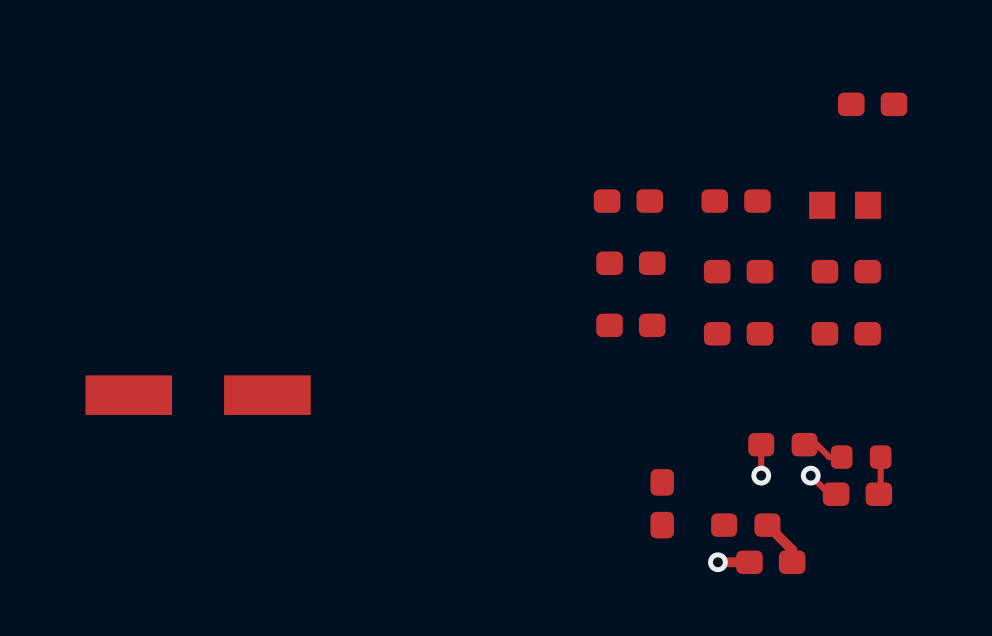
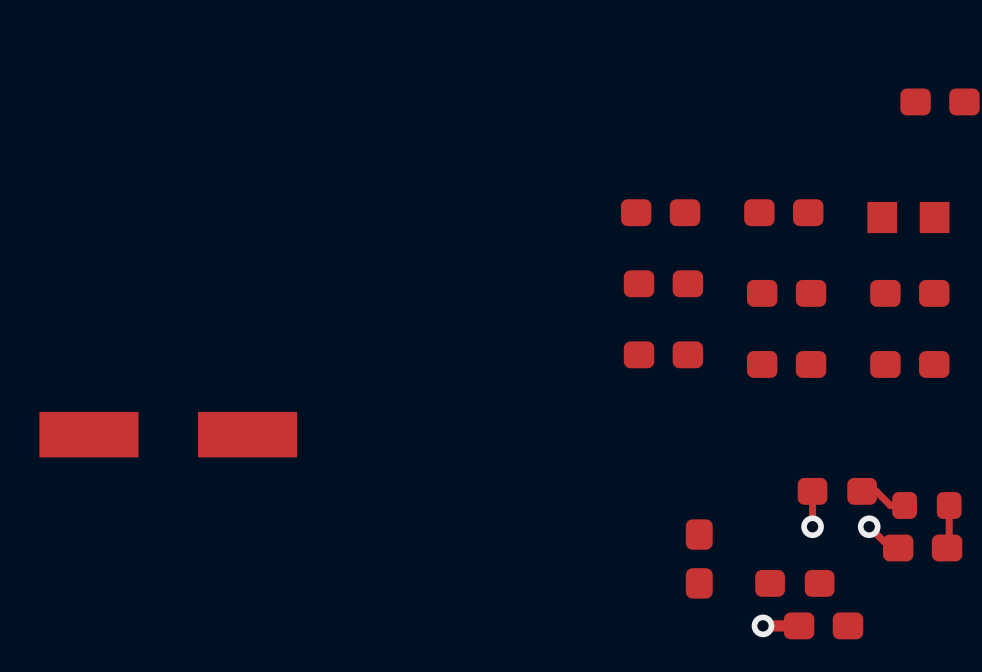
top track: (767, 525) (792, 549) (792, 562) -> none

